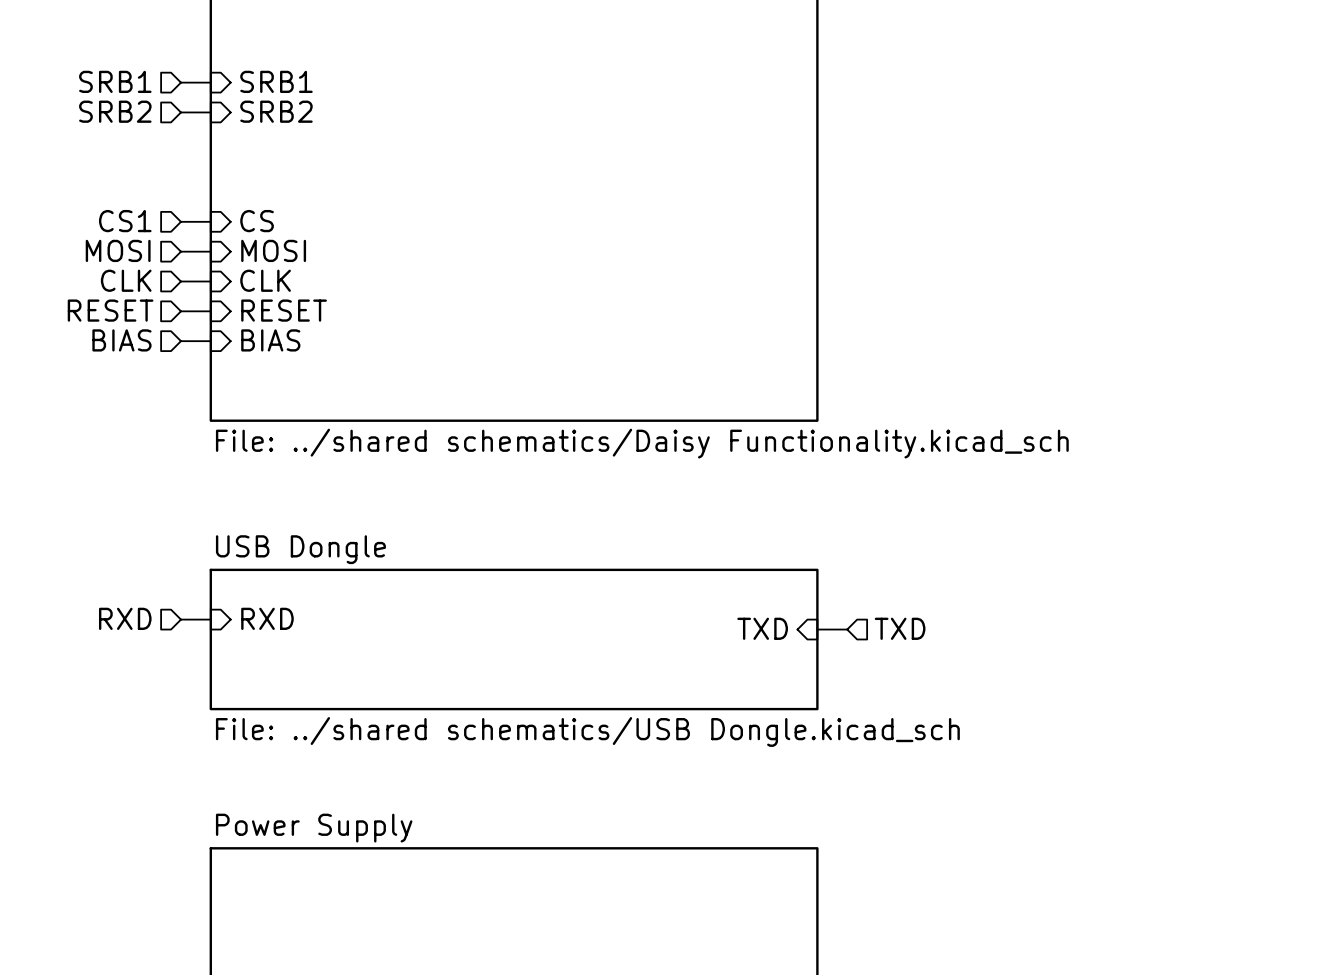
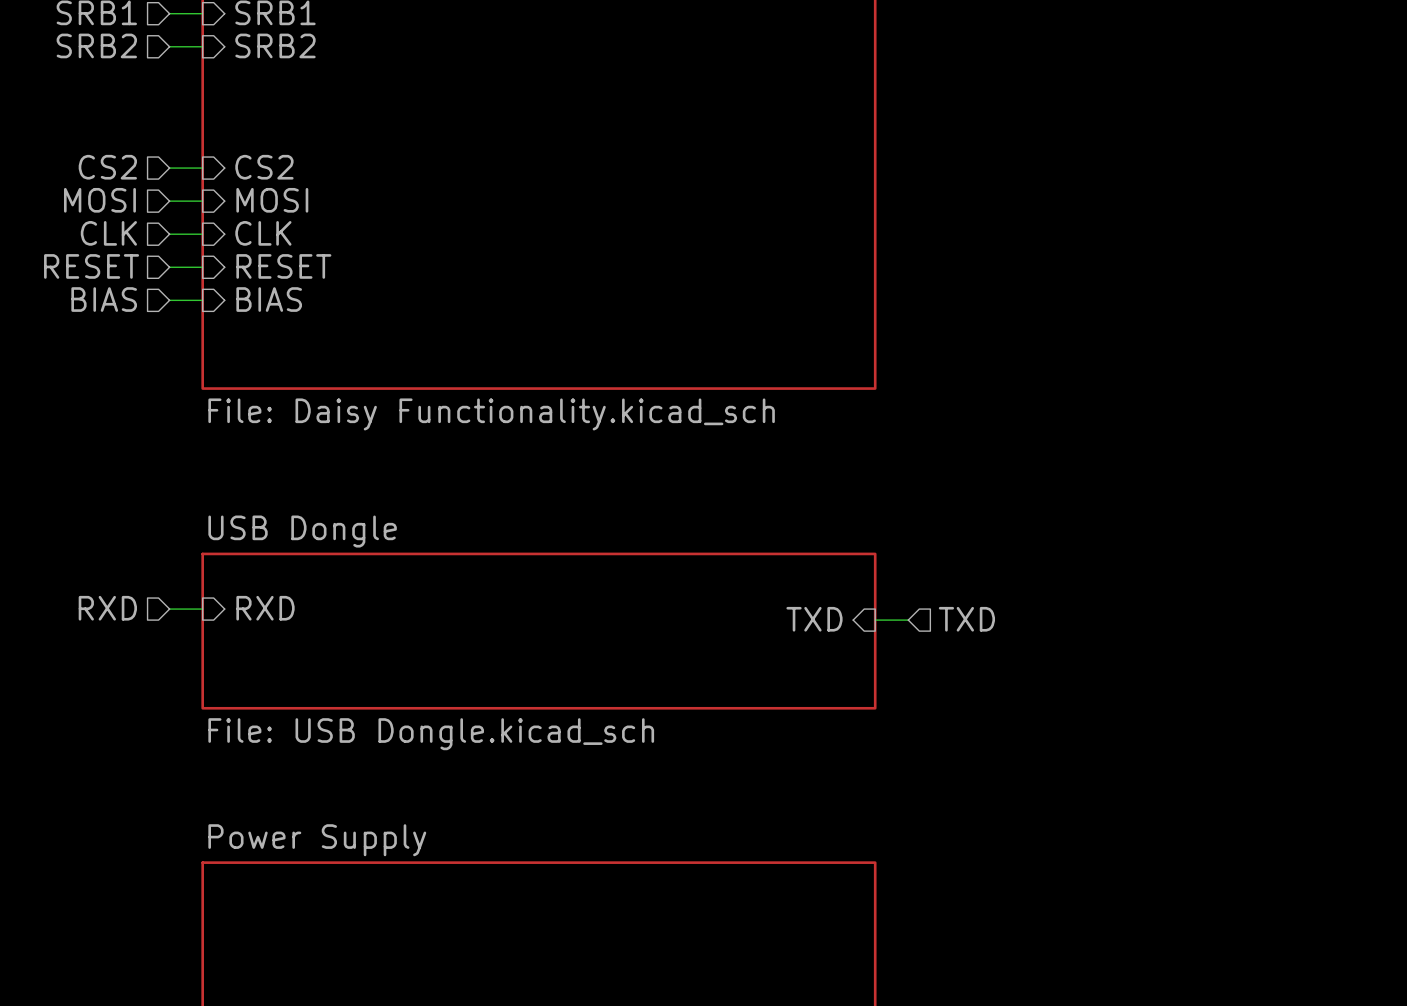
hierarchical label: CS1 (125, 221) -> CS2 (107, 167)
sheet pin: CS (257, 221) -> CS2 (264, 167)
sheet value: File: ../shared schematics/Daisy Functionality.kicad_sch (642, 443) -> File: Daisy Functionality.kicad_sch (491, 414)
sheet USB Dongle value: File: ../shared schematics/USB Dongle.kicad_sch (587, 731) -> File: USB Dongle.kicad_sch (431, 734)

